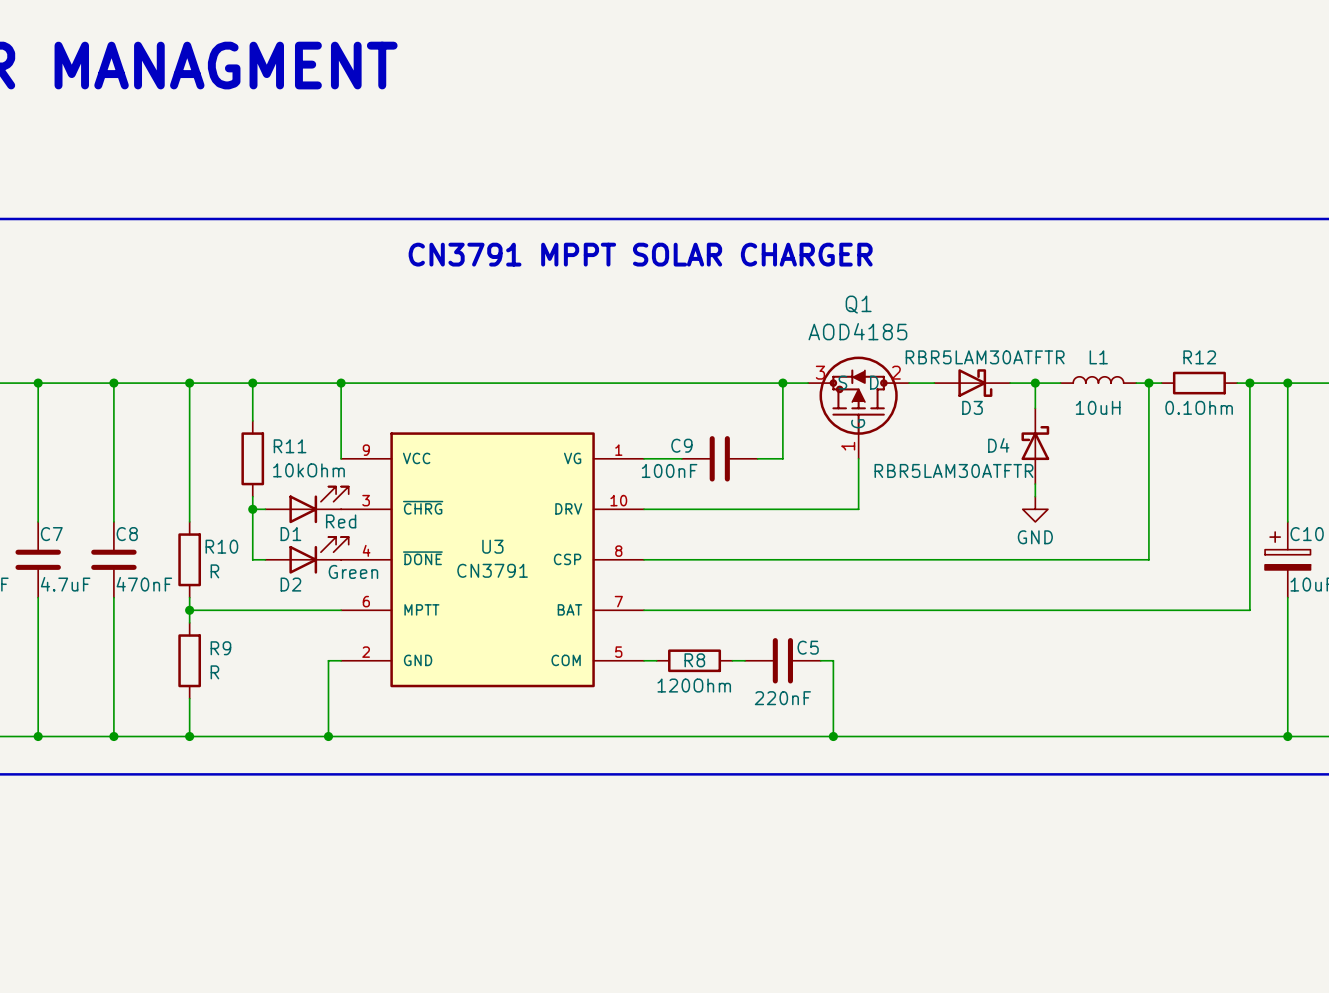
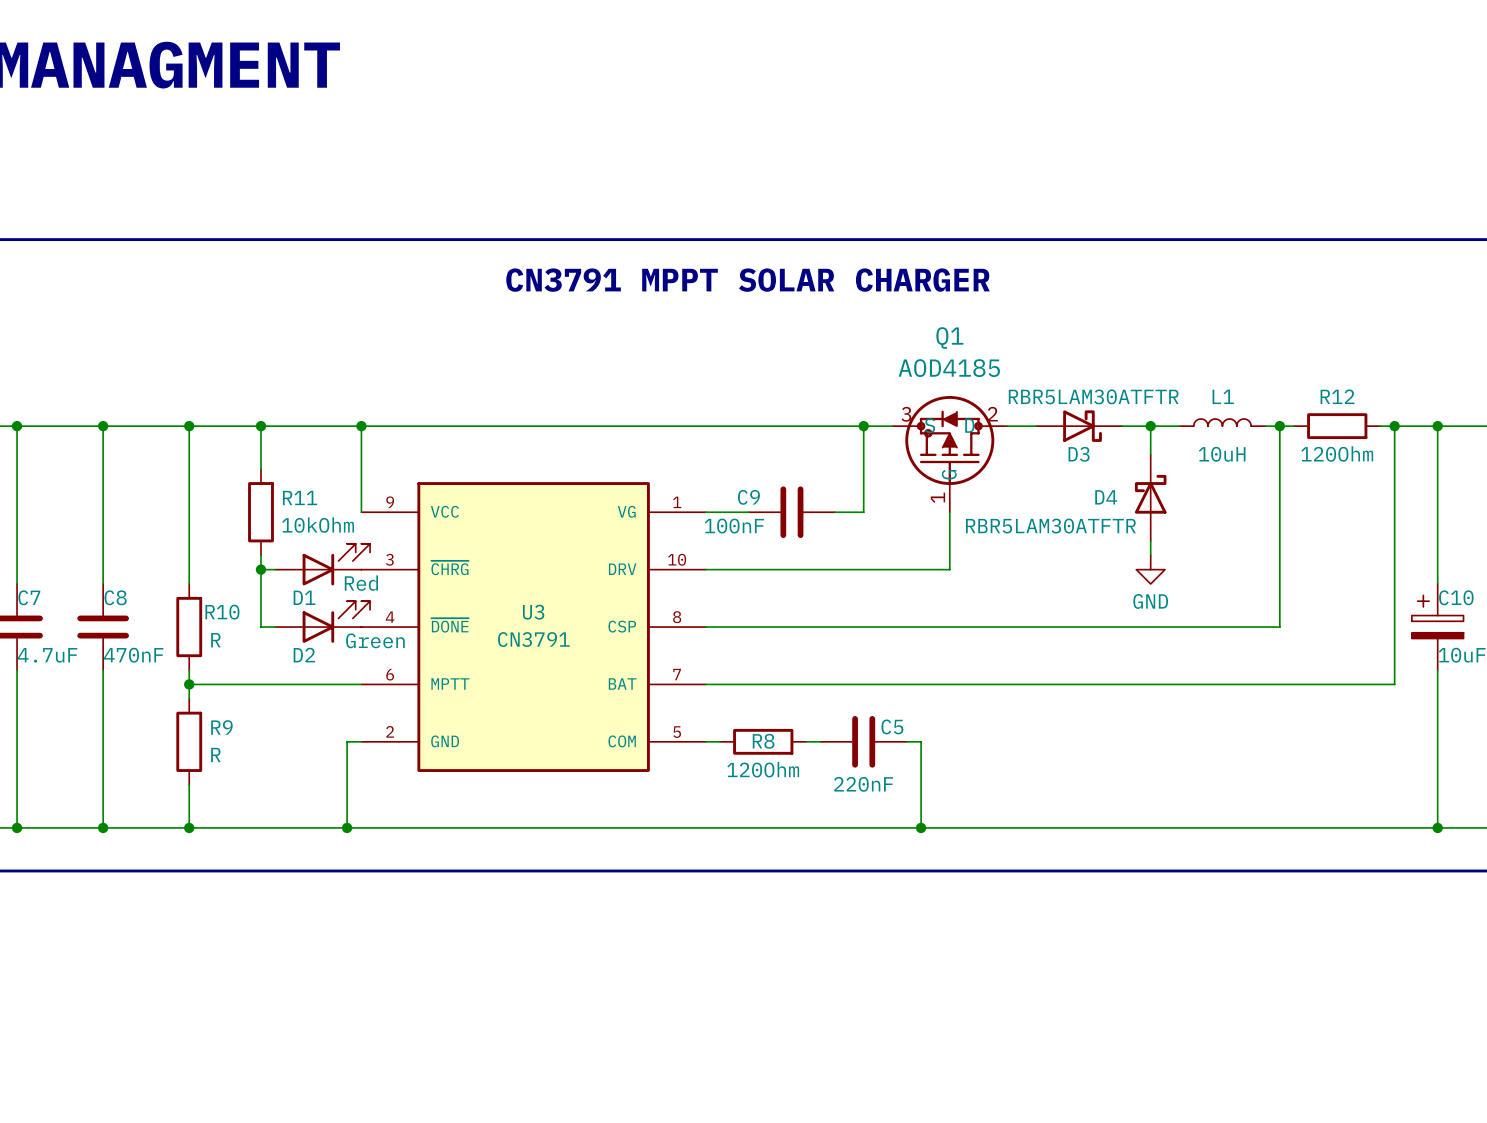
text position: CN3791 MPPT SOLAR CHARGER (640, 254) -> CN3791 MPPT SOLAR CHARGER (748, 280)
R12 value: 0.1Ohm (1199, 407) -> 120Ohm (1337, 453)

